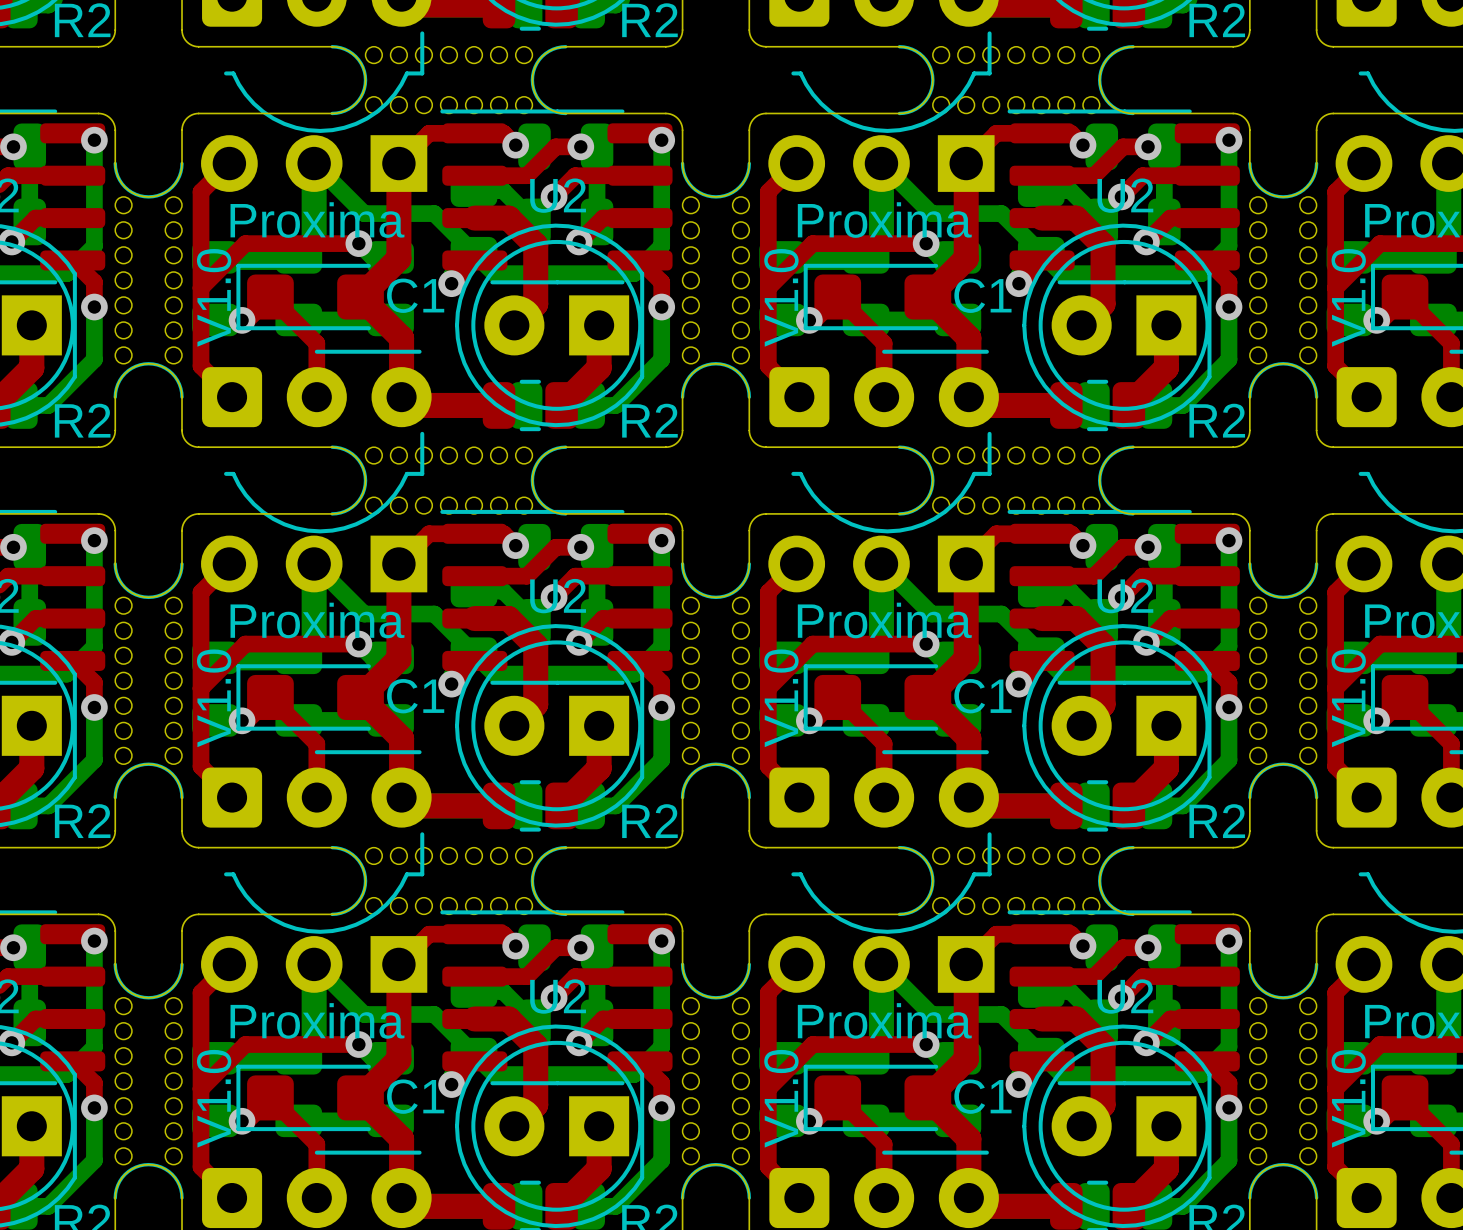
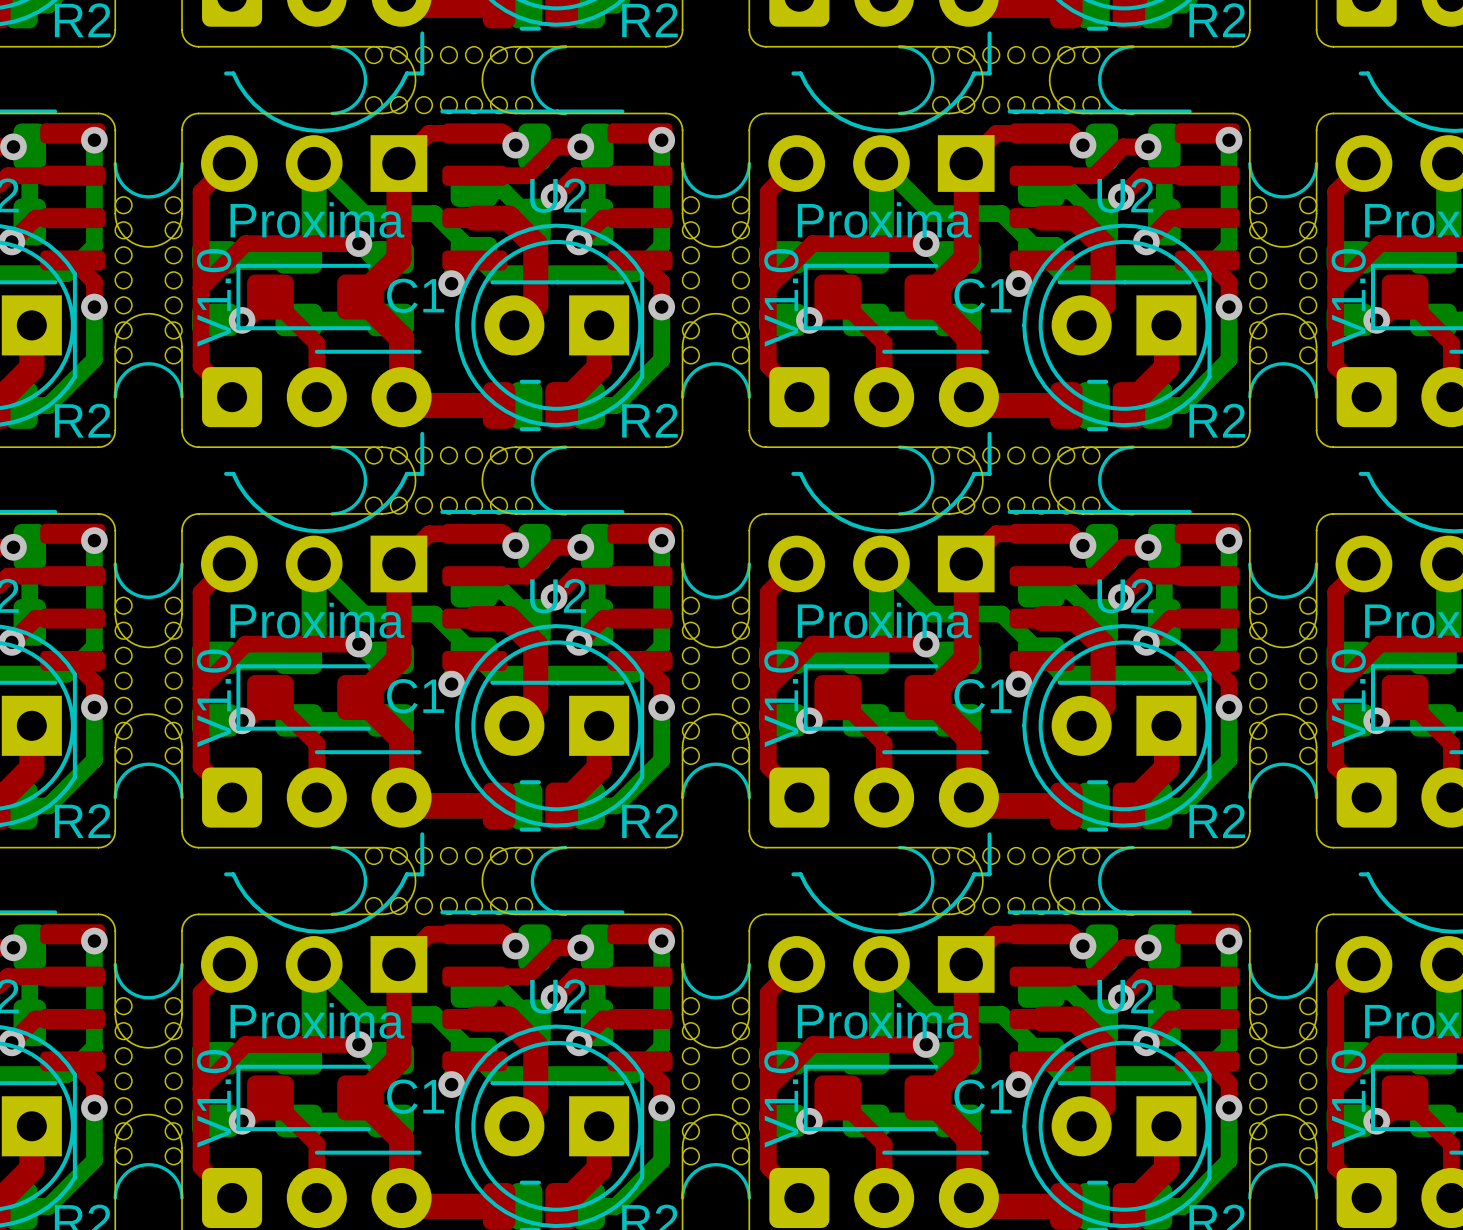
board edge: (332, 46) (344, 49) (355, 56) (363, 67) (365, 80) (363, 92) (355, 103) (344, 110) (332, 113) -> (332, 46) (382, 46) (395, 49) (408, 59) (414, 71) (415, 80) (414, 88) (408, 100) (395, 110) (382, 113) (332, 113)
board edge: (565, 46) (552, 49) (542, 56) (534, 67) (532, 80) (534, 92) (542, 103) (552, 110) (565, 113) -> (565, 46) (515, 46) (502, 49) (489, 59) (483, 71) (482, 80) (483, 88) (489, 100) (502, 110) (515, 113) (565, 113)
board edge: (899, 46) (912, 49) (923, 56) (930, 67) (932, 80) (930, 92) (923, 103) (912, 110) (899, 113) -> (899, 46) (949, 46) (962, 49) (976, 59) (981, 71) (982, 80) (981, 88) (976, 100) (962, 110) (949, 113) (899, 113)
board edge: (1133, 46) (1120, 49) (1109, 56) (1102, 67) (1099, 80) (1102, 92) (1109, 103) (1120, 110) (1133, 113) -> (1133, 46) (1083, 46) (1070, 49) (1056, 59) (1050, 71) (1049, 80) (1050, 88) (1056, 100) (1070, 110) (1083, 113) (1133, 113)
board edge: (115, 163) (117, 176) (125, 187) (135, 194) (148, 196) (161, 194) (172, 187) (179, 176) (182, 163) -> (115, 163) (115, 213) (117, 226) (128, 240) (135, 244) (148, 246) (161, 244) (168, 240) (179, 226) (182, 213) (182, 163)
board edge: (682, 163) (685, 176) (692, 187) (703, 194) (715, 196) (728, 194) (739, 187) (746, 176) (749, 163) -> (682, 163) (682, 213) (685, 226) (695, 240) (703, 244) (715, 246) (728, 244) (736, 240) (746, 226) (749, 213) (749, 163)
board edge: (1249, 163) (1252, 176) (1259, 187) (1270, 194) (1283, 196) (1296, 194) (1306, 187) (1314, 176) (1316, 163) -> (1249, 163) (1249, 213) (1252, 226) (1262, 240) (1270, 244) (1283, 246) (1296, 244) (1303, 240) (1314, 226) (1316, 213) (1316, 163)
board edge: (115, 397) (117, 384) (125, 373) (135, 366) (148, 363) (161, 366) (172, 373) (179, 384) (182, 397) -> (115, 397) (115, 347) (117, 334) (128, 320) (135, 316) (148, 313) (161, 316) (168, 320) (179, 334) (182, 347) (182, 397)
board edge: (682, 397) (685, 384) (692, 373) (703, 366) (715, 363) (728, 366) (739, 373) (746, 384) (749, 397) -> (682, 397) (682, 347) (685, 334) (695, 320) (703, 316) (715, 313) (728, 316) (736, 320) (746, 334) (749, 347) (749, 397)
board edge: (1249, 397) (1252, 384) (1259, 373) (1270, 366) (1283, 363) (1296, 366) (1306, 373) (1314, 384) (1316, 397) -> (1249, 397) (1249, 347) (1252, 334) (1262, 320) (1270, 316) (1283, 313) (1296, 316) (1303, 320) (1314, 334) (1316, 347) (1316, 397)
board edge: (332, 447) (344, 449) (355, 456) (363, 467) (365, 480) (363, 493) (355, 504) (344, 511) (332, 513) -> (332, 447) (382, 447) (395, 449) (408, 460) (414, 471) (415, 480) (414, 489) (408, 500) (395, 511) (382, 513) (332, 513)
board edge: (565, 447) (552, 449) (542, 456) (534, 467) (532, 480) (534, 493) (542, 504) (552, 511) (565, 513) -> (565, 447) (515, 447) (502, 449) (489, 460) (483, 471) (482, 480) (483, 489) (489, 500) (502, 511) (515, 513) (565, 513)
board edge: (899, 447) (912, 449) (923, 456) (930, 467) (932, 480) (930, 493) (923, 504) (912, 511) (899, 513) -> (899, 447) (949, 447) (962, 449) (976, 460) (981, 471) (982, 480) (981, 489) (976, 500) (962, 511) (949, 513) (899, 513)
board edge: (1133, 447) (1120, 449) (1109, 456) (1102, 467) (1099, 480) (1102, 493) (1109, 504) (1120, 511) (1133, 513) -> (1133, 447) (1083, 447) (1070, 449) (1056, 460) (1050, 471) (1049, 480) (1050, 489) (1056, 500) (1070, 511) (1083, 513) (1133, 513)
board edge: (115, 563) (117, 576) (125, 587) (135, 594) (148, 597) (161, 594) (172, 587) (179, 576) (182, 563) -> (115, 563) (115, 614) (117, 626) (128, 640) (135, 644) (148, 647) (161, 644) (168, 640) (179, 626) (182, 614) (182, 563)
board edge: (682, 563) (685, 576) (692, 587) (703, 594) (715, 597) (728, 594) (739, 587) (746, 576) (749, 563) -> (682, 563) (682, 614) (685, 626) (695, 640) (703, 644) (715, 647) (728, 644) (736, 640) (746, 626) (749, 614) (749, 563)
board edge: (1249, 563) (1252, 576) (1259, 587) (1270, 594) (1283, 597) (1296, 594) (1306, 587) (1314, 576) (1316, 563) -> (1249, 563) (1249, 614) (1252, 626) (1262, 640) (1270, 644) (1283, 647) (1296, 644) (1303, 640) (1314, 626) (1316, 614) (1316, 563)
board edge: (115, 797) (117, 784) (125, 773) (135, 766) (148, 764) (161, 766) (172, 773) (179, 784) (182, 797) -> (115, 797) (115, 747) (117, 734) (128, 721) (135, 716) (148, 714) (161, 716) (168, 721) (179, 734) (182, 747) (182, 797)
board edge: (682, 797) (685, 784) (692, 773) (703, 766) (715, 764) (728, 766) (739, 773) (746, 784) (749, 797) -> (682, 797) (682, 747) (685, 734) (695, 721) (703, 716) (715, 714) (728, 716) (736, 721) (746, 734) (749, 747) (749, 797)
board edge: (1249, 797) (1252, 784) (1259, 773) (1270, 766) (1283, 764) (1296, 766) (1306, 773) (1314, 784) (1316, 797) -> (1249, 797) (1249, 747) (1252, 734) (1262, 721) (1270, 716) (1283, 714) (1296, 716) (1303, 721) (1314, 734) (1316, 747) (1316, 797)
board edge: (332, 847) (344, 850) (355, 857) (363, 868) (365, 881) (363, 893) (355, 904) (344, 911) (332, 914) -> (332, 847) (382, 847) (395, 850) (408, 860) (414, 872) (415, 881) (414, 889) (408, 901) (395, 911) (382, 914) (332, 914)
board edge: (565, 847) (552, 850) (542, 857) (534, 868) (532, 881) (534, 893) (542, 904) (552, 911) (565, 914) -> (565, 847) (515, 847) (502, 850) (489, 860) (483, 872) (482, 881) (483, 889) (489, 901) (502, 911) (515, 914) (565, 914)
board edge: (899, 847) (912, 850) (923, 857) (930, 868) (932, 881) (930, 893) (923, 904) (912, 911) (899, 914) -> (899, 847) (949, 847) (962, 850) (976, 860) (981, 872) (982, 881) (981, 889) (976, 901) (962, 911) (949, 914) (899, 914)
board edge: (1133, 847) (1120, 850) (1109, 857) (1102, 868) (1099, 881) (1102, 893) (1109, 904) (1120, 911) (1133, 914) -> (1133, 847) (1083, 847) (1070, 850) (1056, 860) (1050, 872) (1049, 881) (1050, 889) (1056, 901) (1070, 911) (1083, 914) (1133, 914)
board edge: (115, 964) (117, 977) (125, 988) (135, 995) (148, 997) (161, 995) (172, 988) (179, 977) (182, 964) -> (115, 964) (115, 1014) (117, 1027) (128, 1040) (140, 1046) (148, 1047) (157, 1046) (168, 1040) (179, 1027) (182, 1014) (182, 964)
board edge: (682, 964) (685, 977) (692, 988) (703, 995) (715, 997) (728, 995) (739, 988) (746, 977) (749, 964) -> (682, 964) (682, 1014) (685, 1027) (695, 1040) (707, 1046) (715, 1047) (724, 1046) (736, 1040) (746, 1027) (749, 1014) (749, 964)
board edge: (1249, 964) (1252, 977) (1259, 988) (1270, 995) (1283, 997) (1296, 995) (1306, 988) (1314, 977) (1316, 964) -> (1249, 964) (1249, 1014) (1252, 1027) (1262, 1040) (1274, 1046) (1283, 1047) (1291, 1046) (1303, 1040) (1314, 1027) (1316, 1014) (1316, 964)
board edge: (115, 1198) (117, 1185) (125, 1174) (135, 1167) (148, 1164) (161, 1167) (172, 1174) (179, 1185) (182, 1198) -> (115, 1198) (115, 1147) (117, 1135) (128, 1121) (140, 1115) (148, 1114) (157, 1115) (168, 1121) (179, 1135) (182, 1147) (182, 1198)
board edge: (682, 1198) (685, 1185) (692, 1174) (703, 1167) (715, 1164) (728, 1167) (739, 1174) (746, 1185) (749, 1198) -> (682, 1198) (682, 1147) (685, 1135) (695, 1121) (707, 1115) (715, 1114) (724, 1115) (736, 1121) (746, 1135) (749, 1147) (749, 1198)
board edge: (1249, 1198) (1252, 1185) (1259, 1174) (1270, 1167) (1283, 1164) (1296, 1167) (1306, 1174) (1314, 1185) (1316, 1198) -> (1249, 1198) (1249, 1147) (1252, 1135) (1262, 1121) (1274, 1115) (1283, 1114) (1291, 1115) (1303, 1121) (1314, 1135) (1316, 1147) (1316, 1198)

